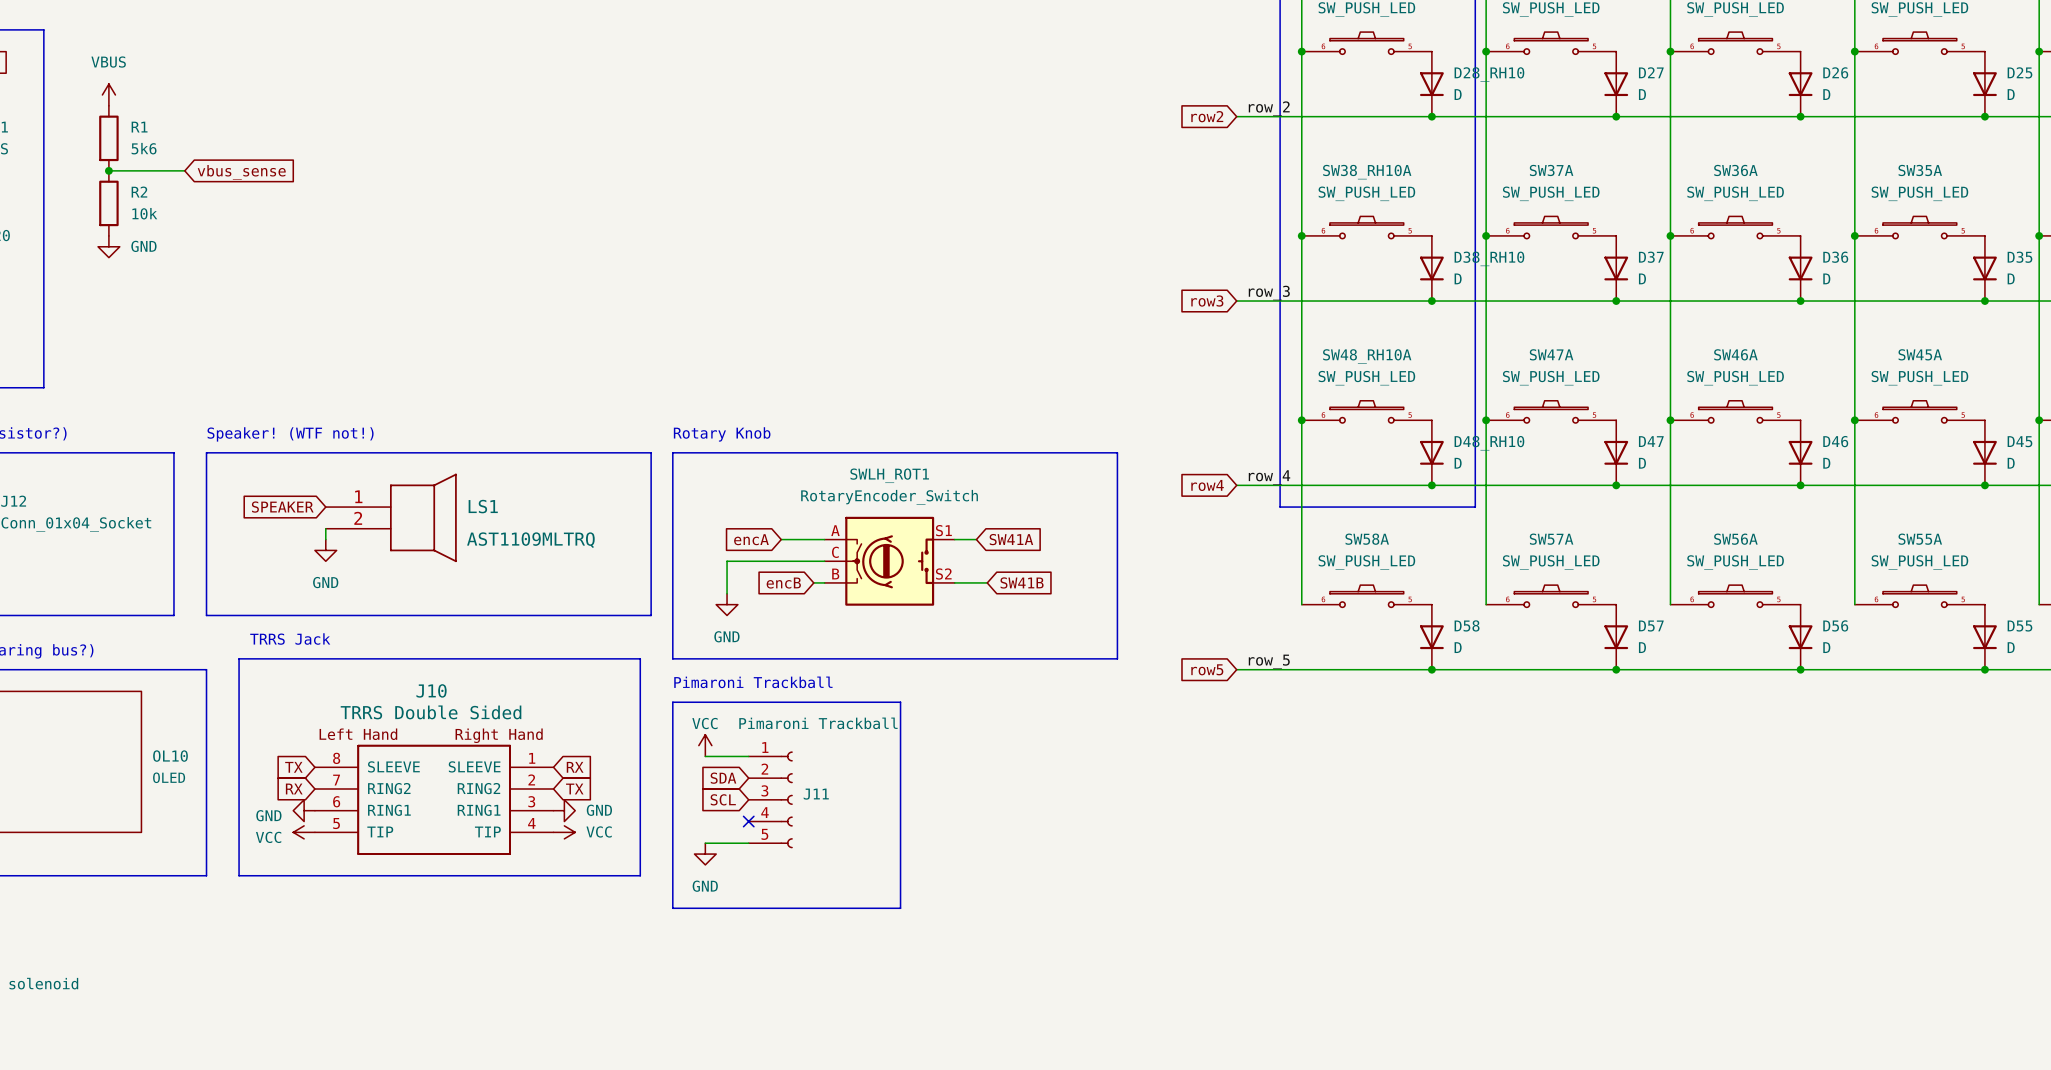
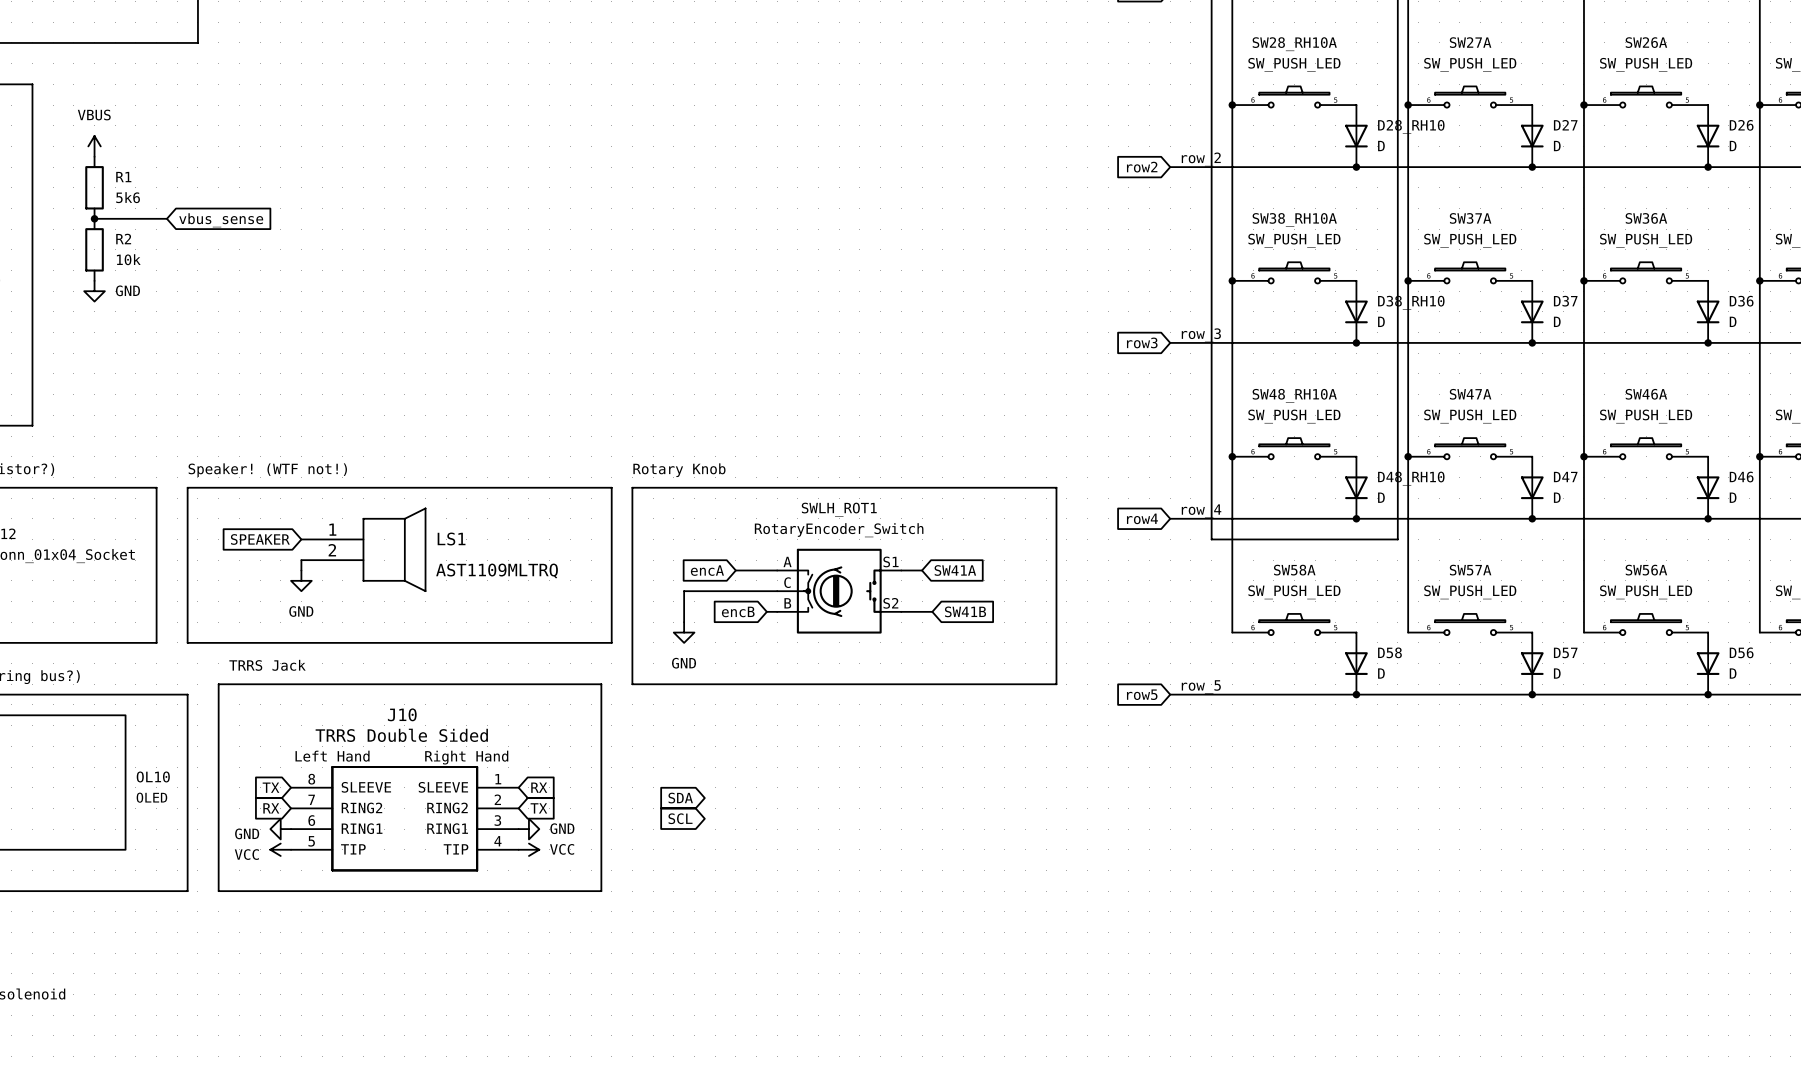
text: Pimaroni Trackball (753, 682) -> none
line: (672, 702) (900, 702) (900, 908) (672, 908) (672, 702) -> none
power symbol: VCC (705, 745) -> none
wire: (705, 756) (748, 756) -> none
J11: Pimaroni Trackball (770, 799) -> none
no-connect mark: (748, 821) -> none
wire: (705, 843) (748, 843) -> none
power symbol: GND (705, 854) -> none

